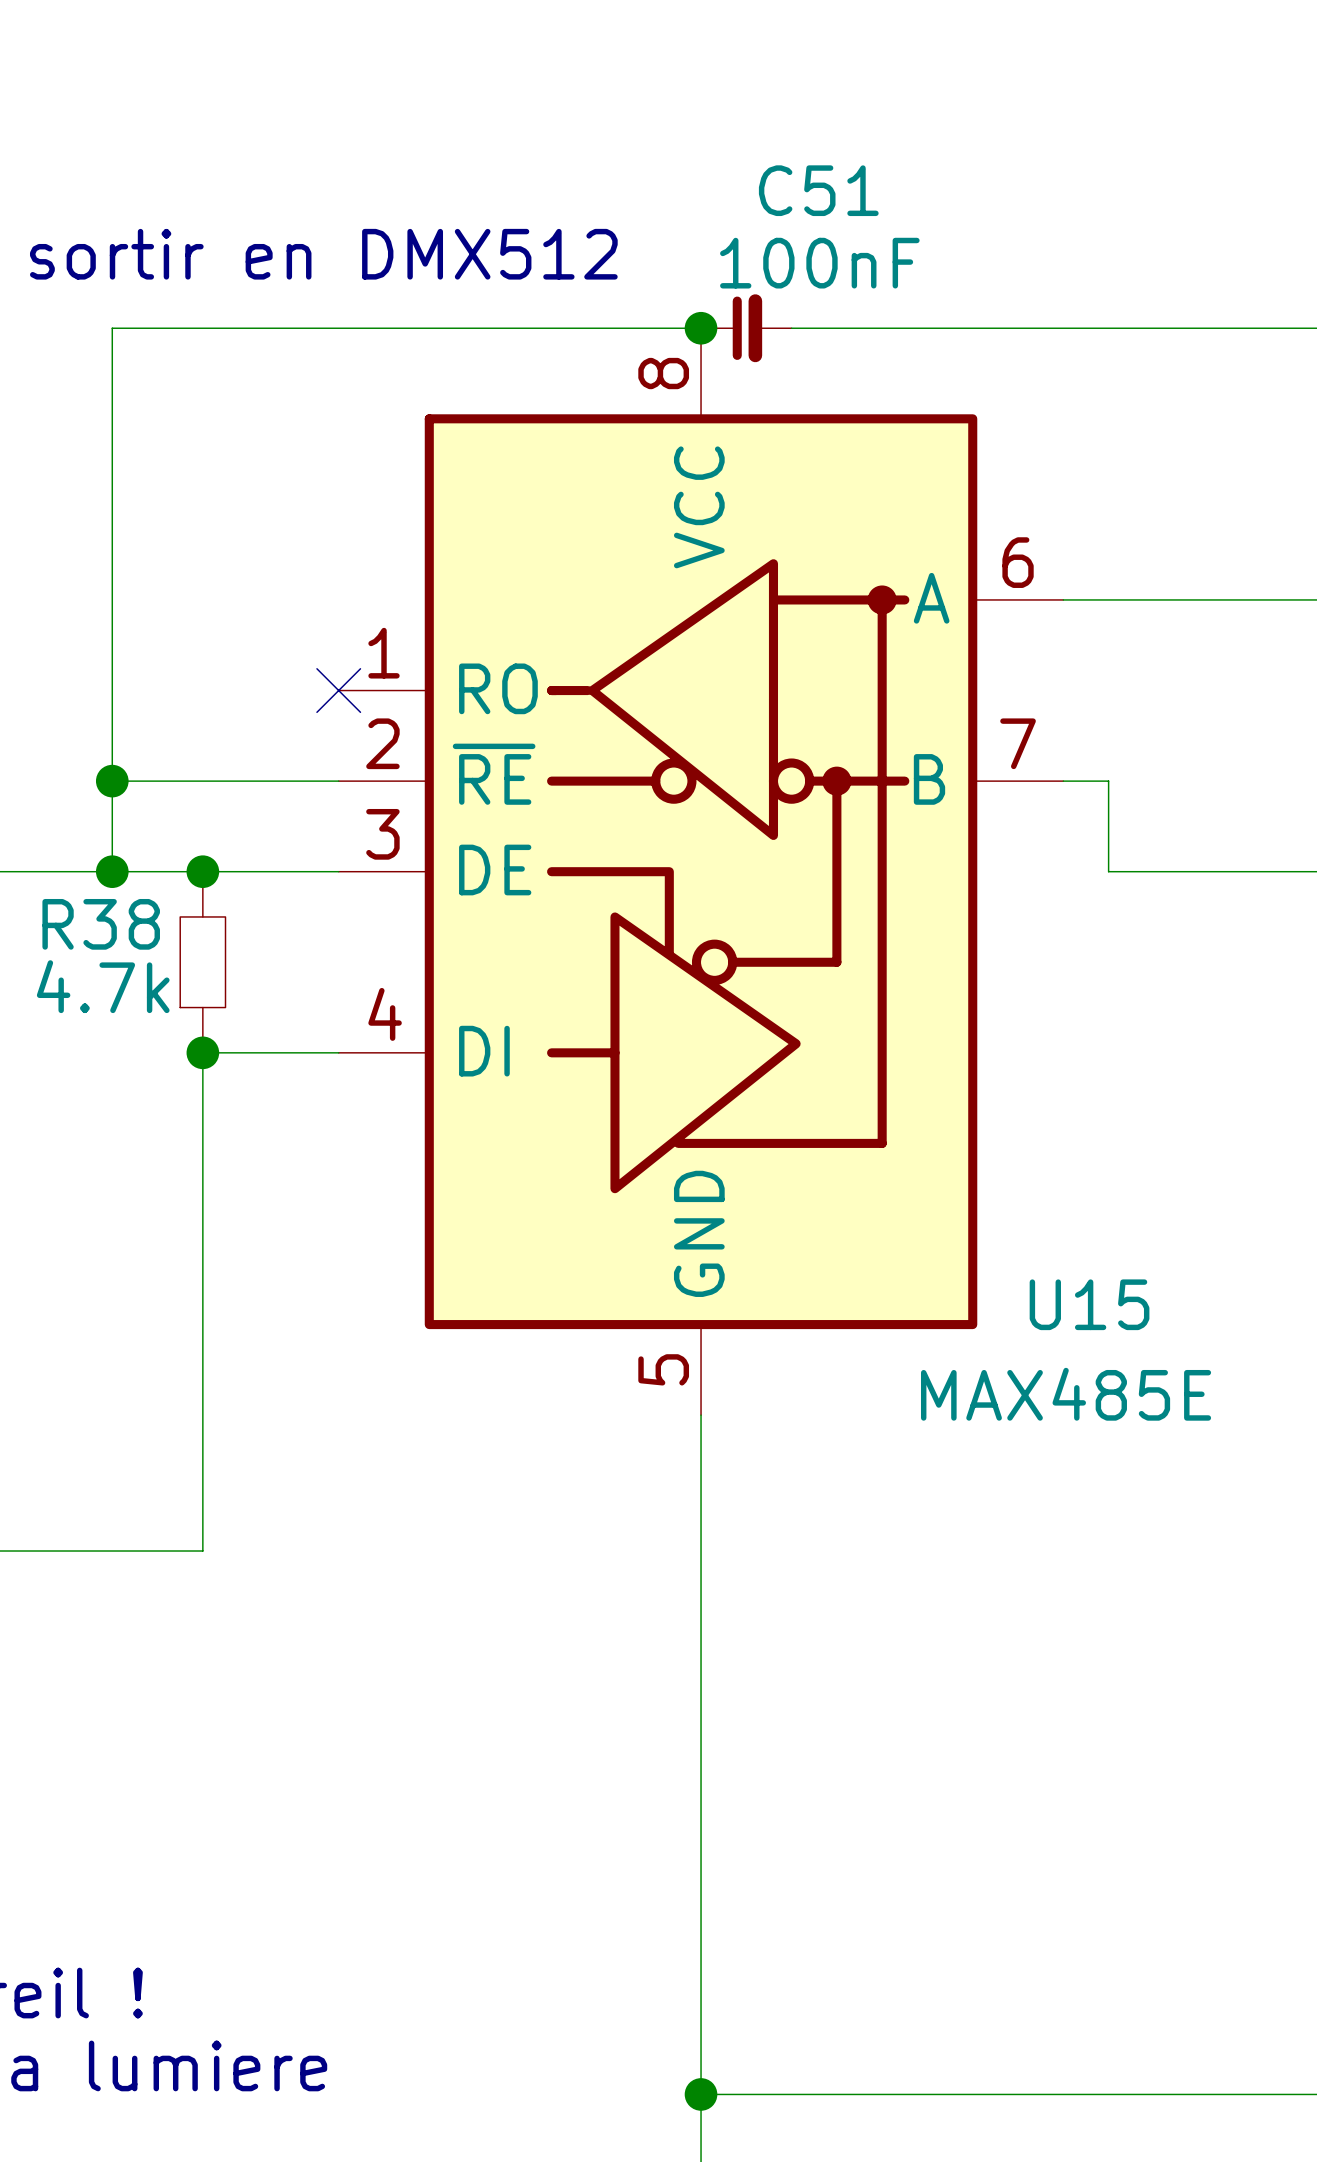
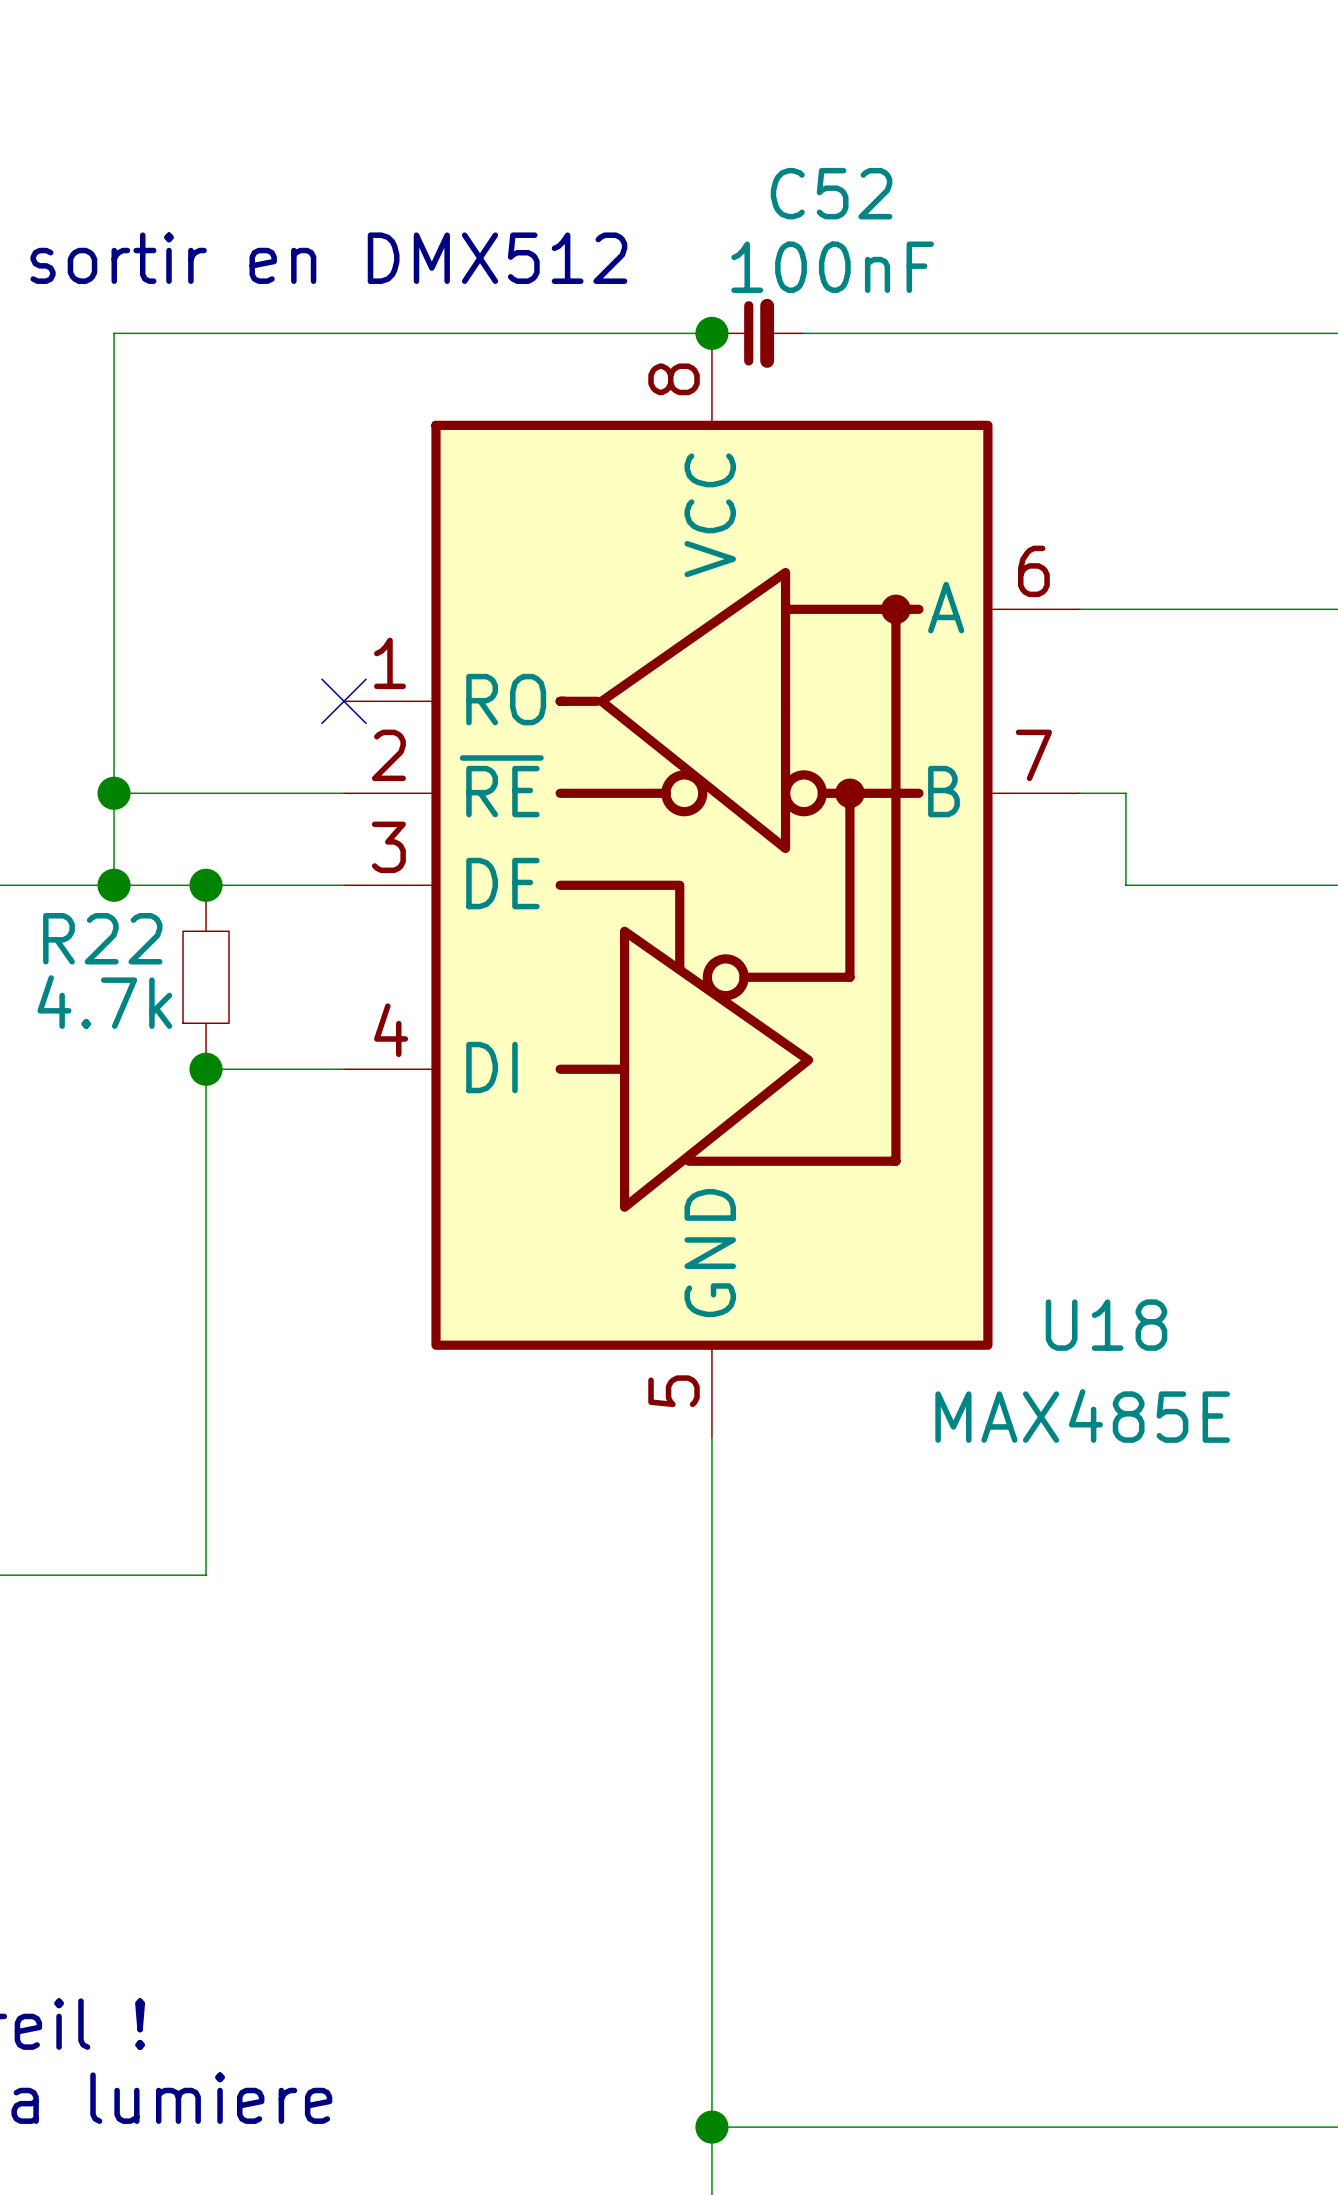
C51 name: C51 (818, 190) -> C52 (831, 193)
R38 name: R38 (101, 924) -> R22 (102, 938)
U15 name: U15 (1089, 1304) -> U18 (1106, 1325)

